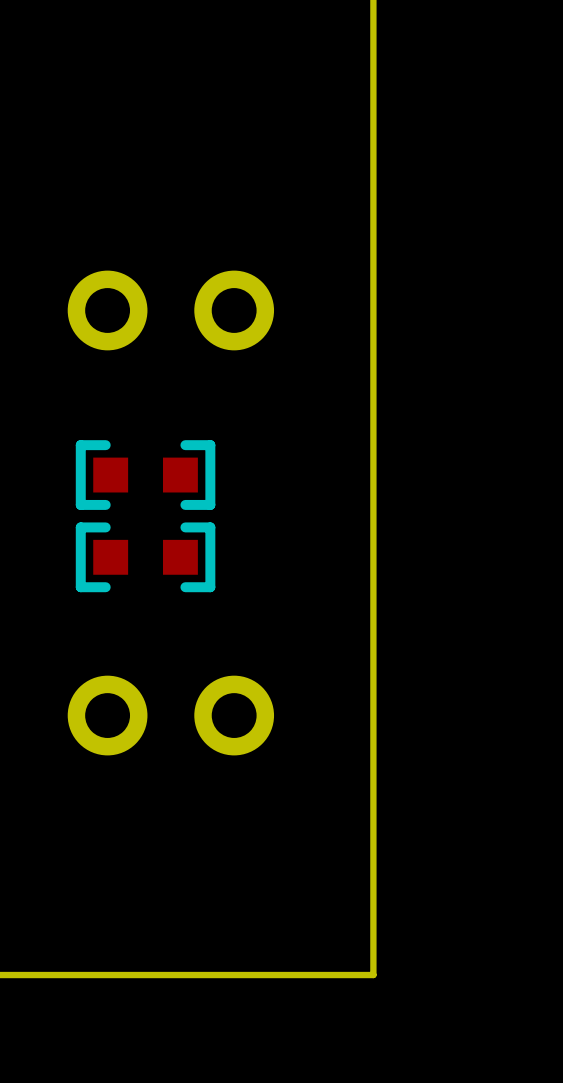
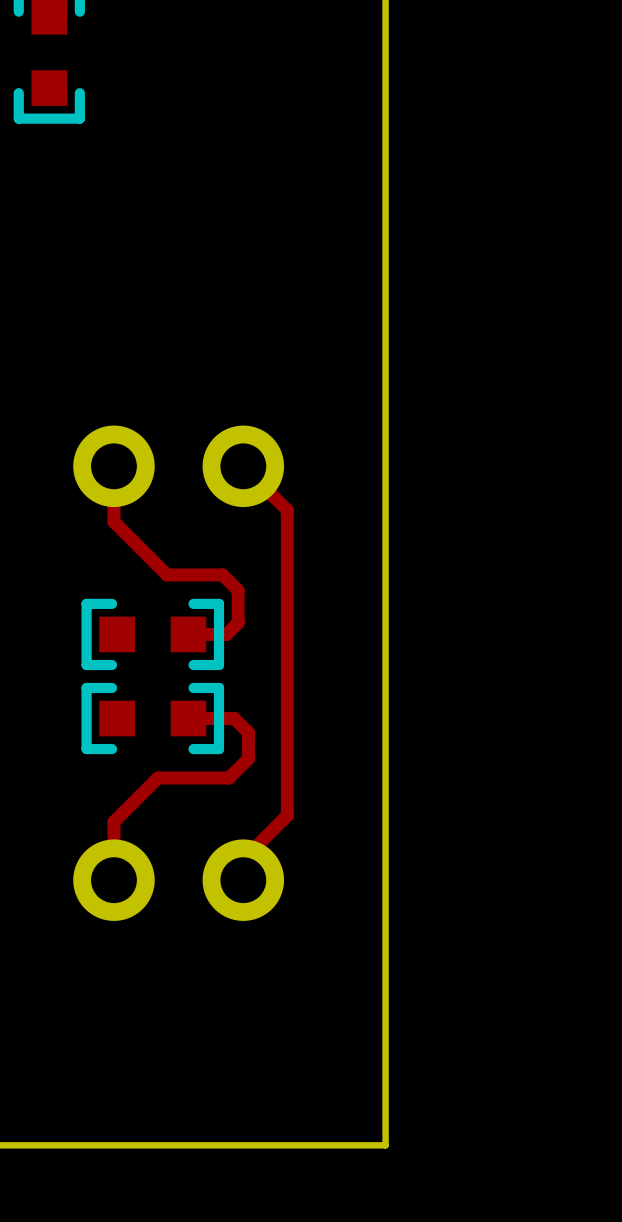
top track: none -> (113, 466) (113, 521) (167, 574) (222, 574) (238, 590) (238, 622) (226, 634) (188, 634)
top track: none -> (243, 466) (287, 510) (287, 815) (243, 859) (243, 880)
top track: none -> (188, 718) (234, 718) (248, 732) (248, 758) (229, 778) (157, 778) (113, 821) (113, 880)

